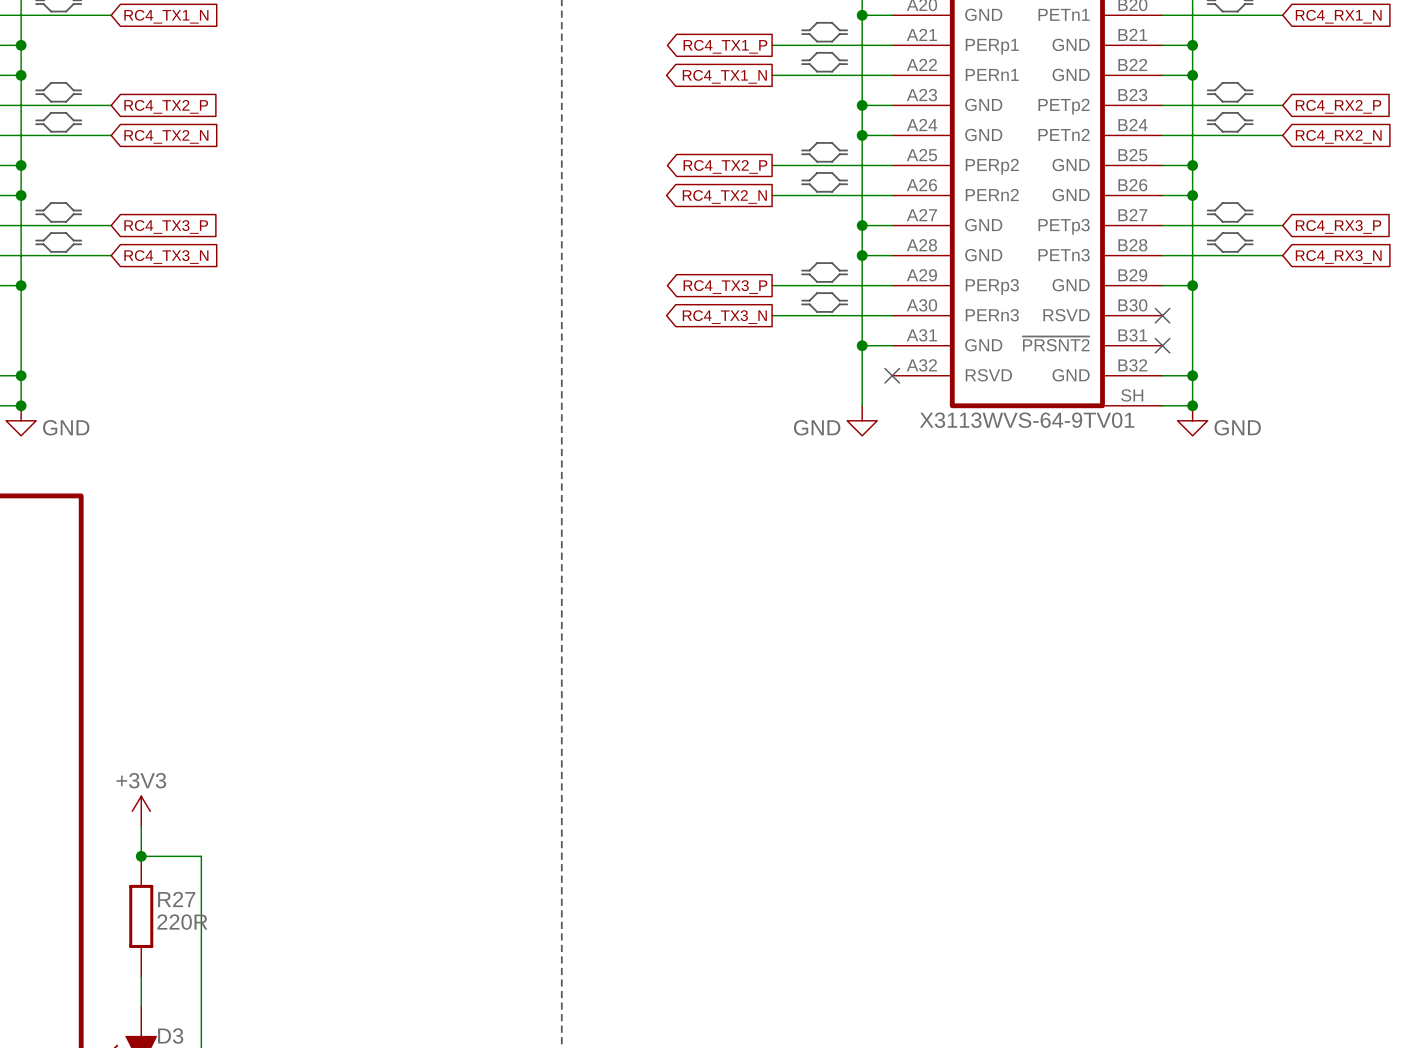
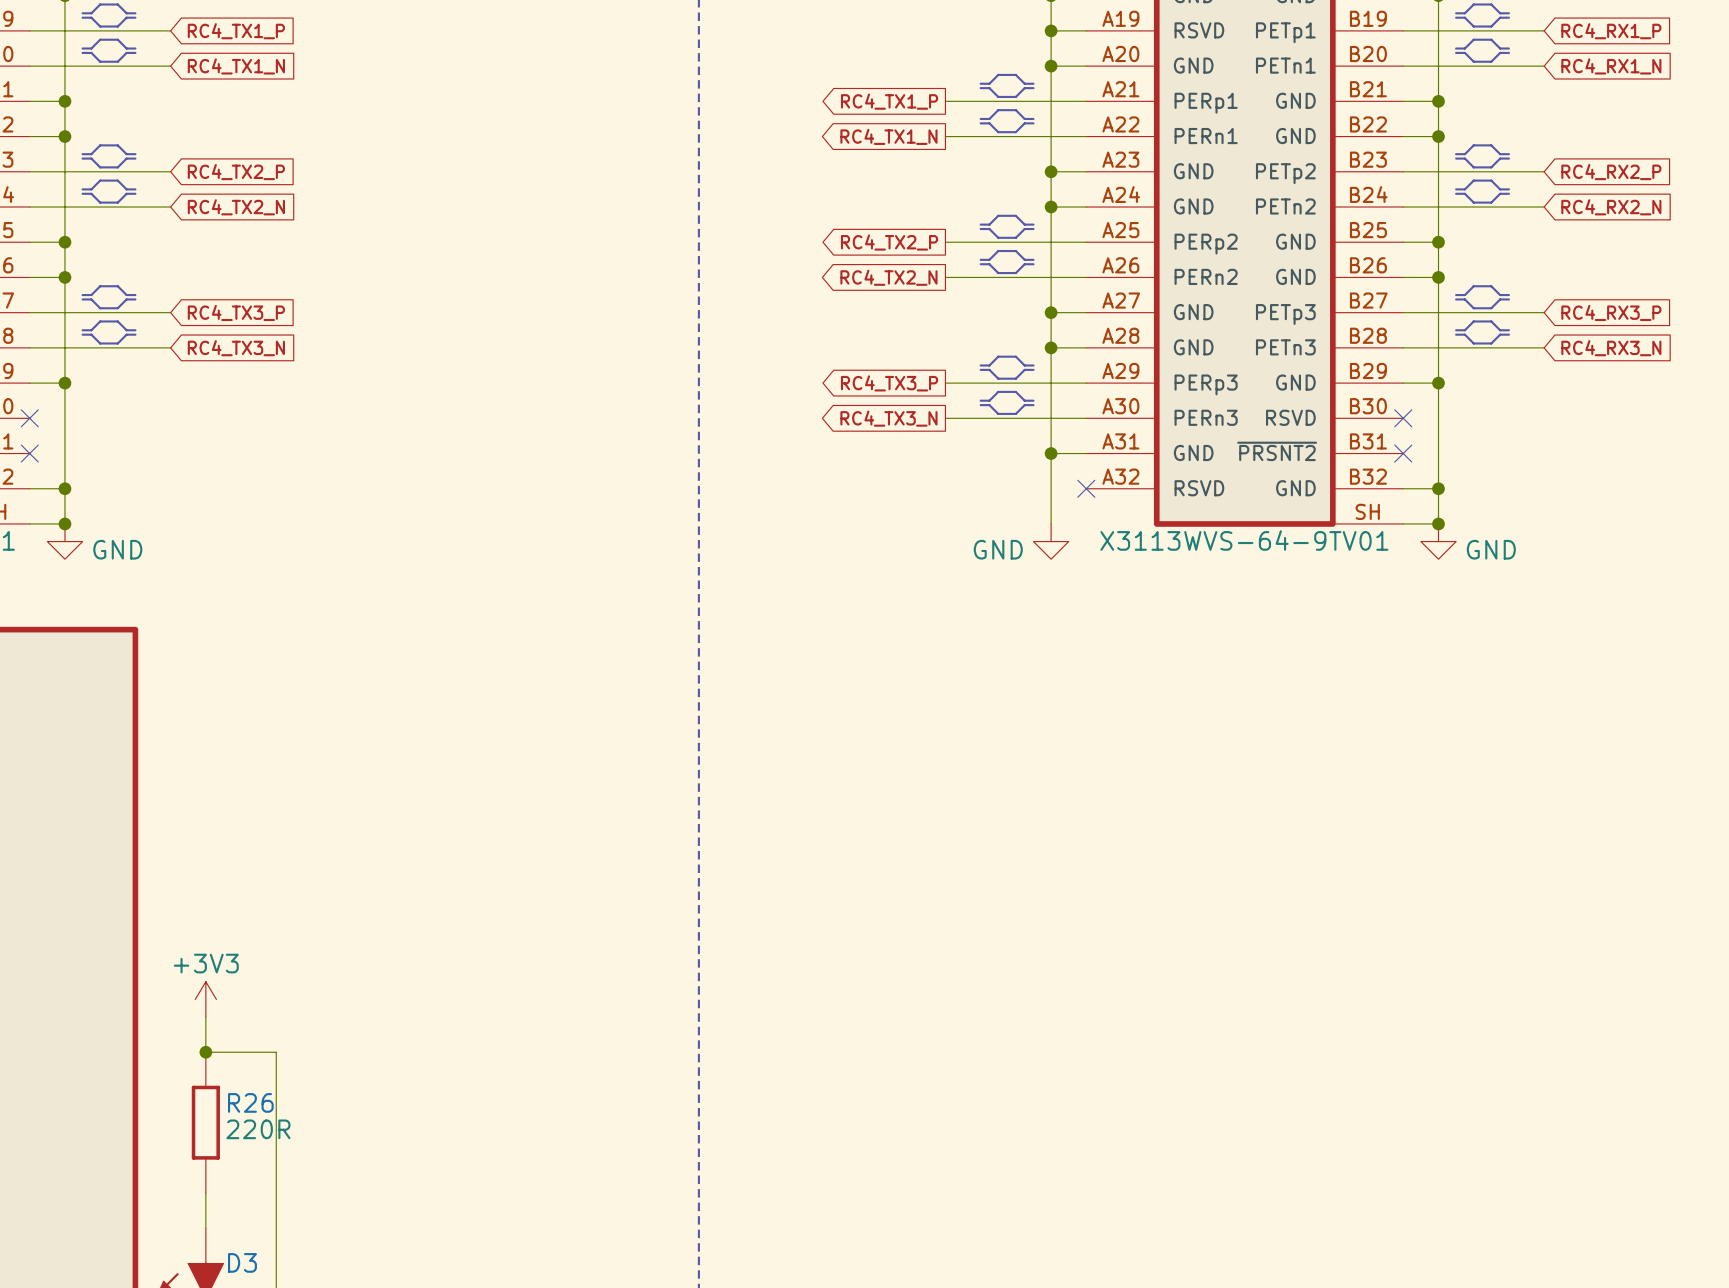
R27 name: R27 (176, 899) -> R26 (250, 1102)

